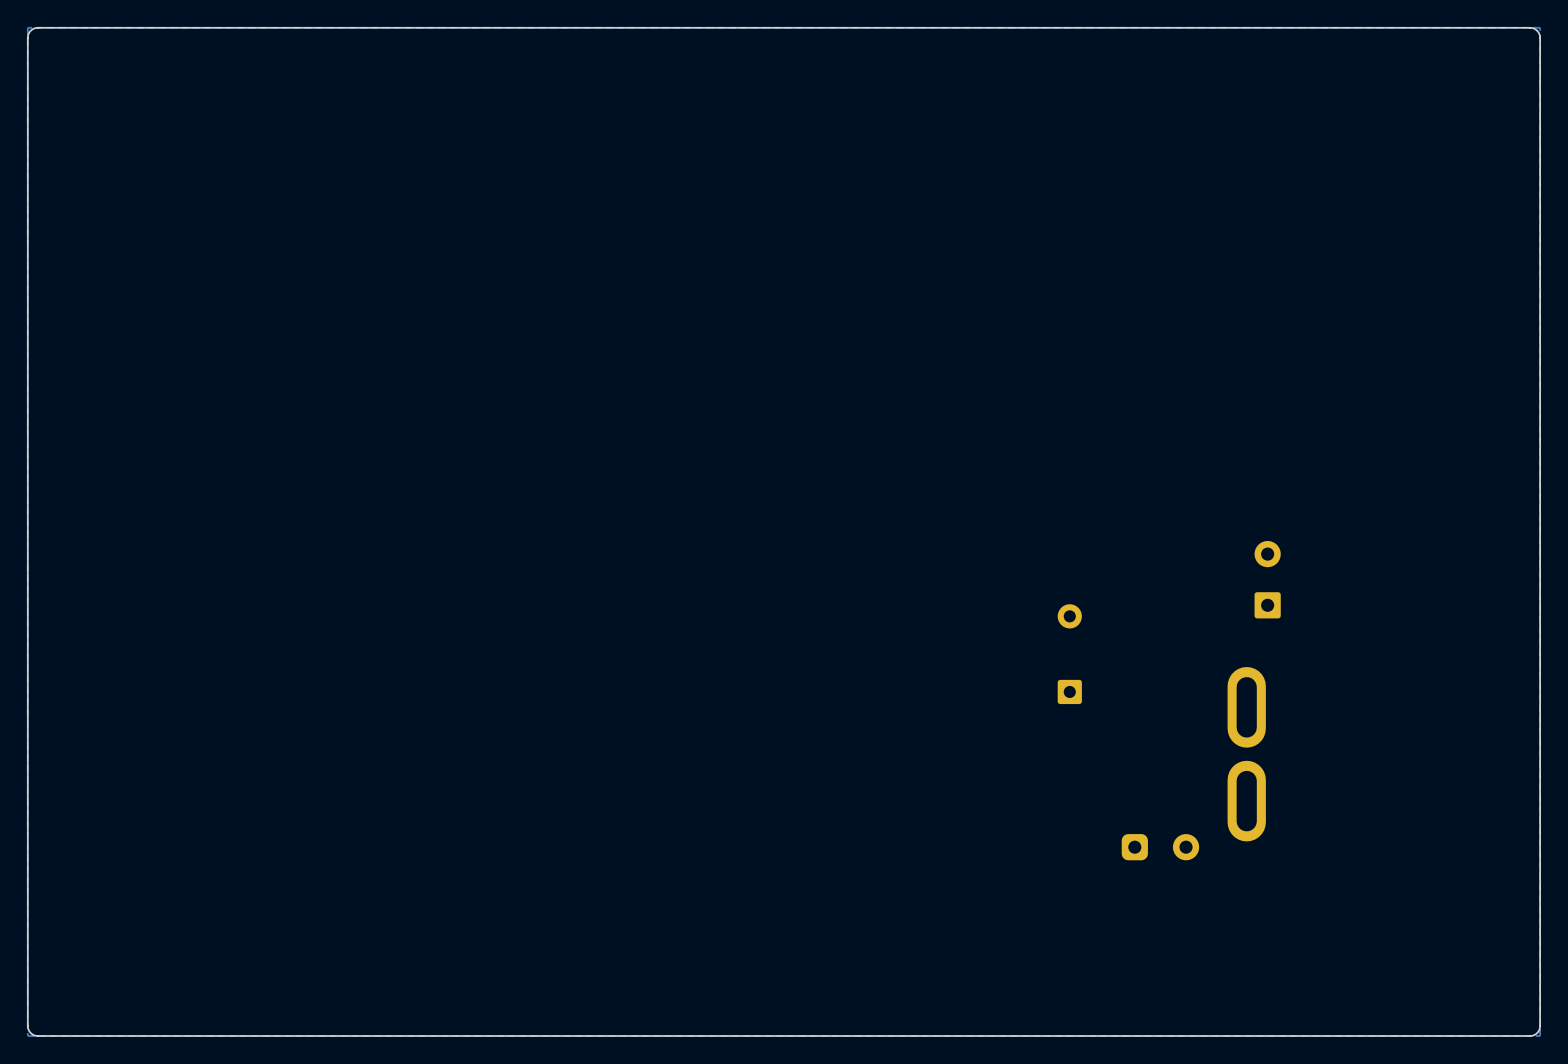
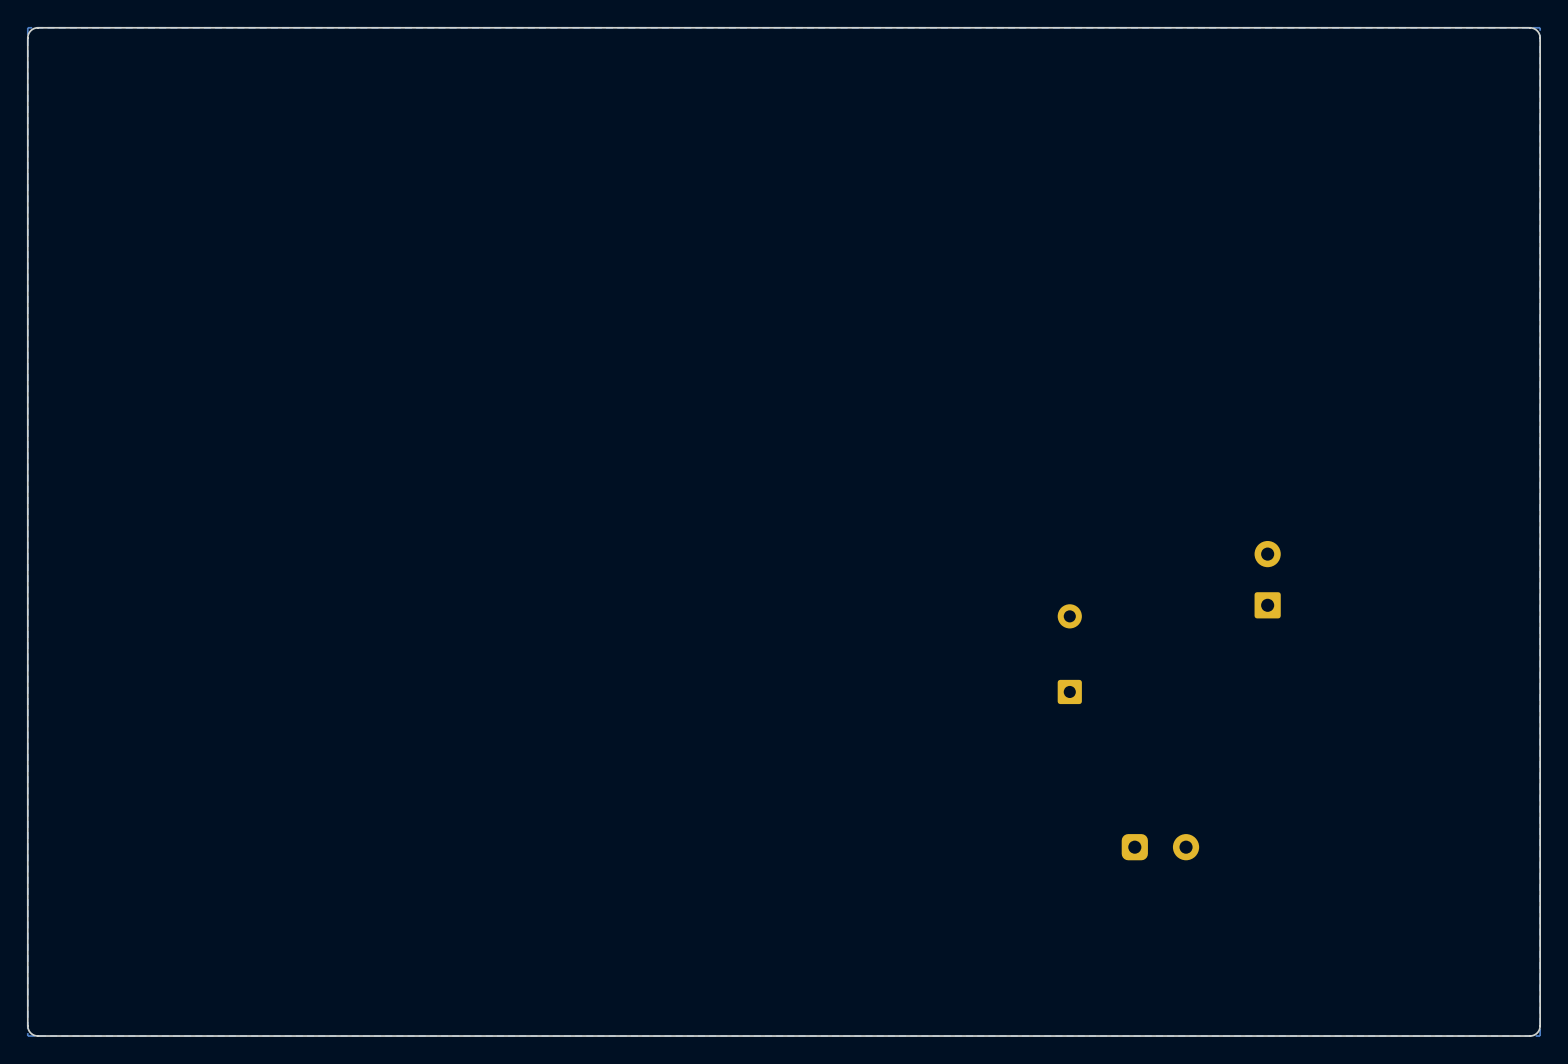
part: (1246, 754) -> none

